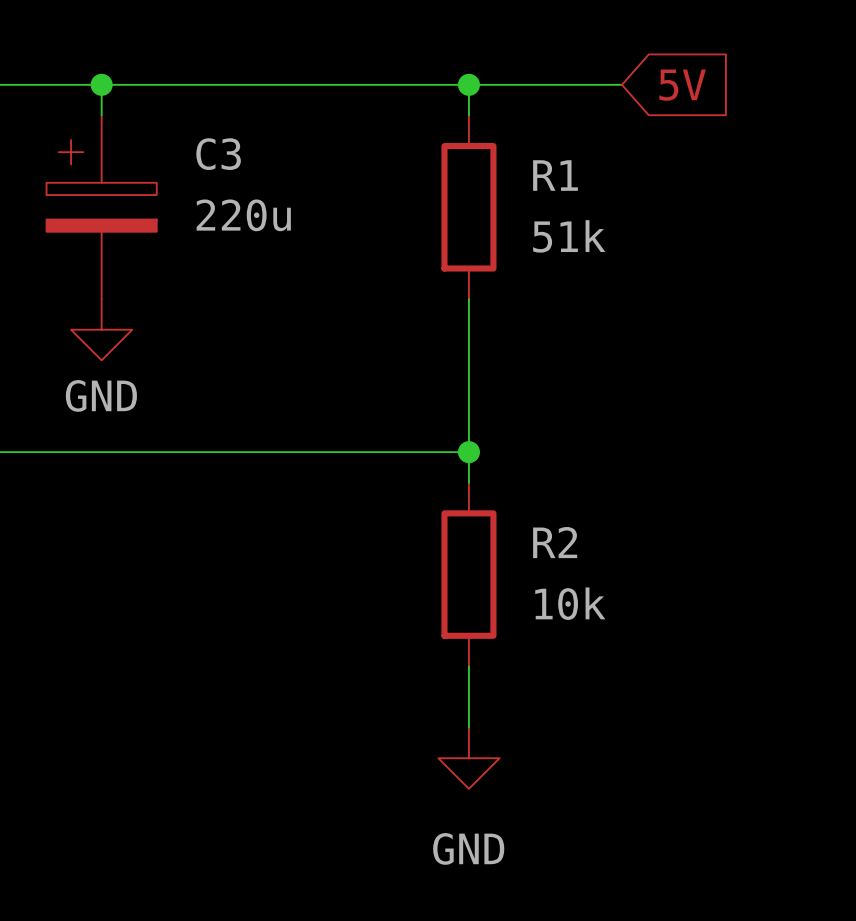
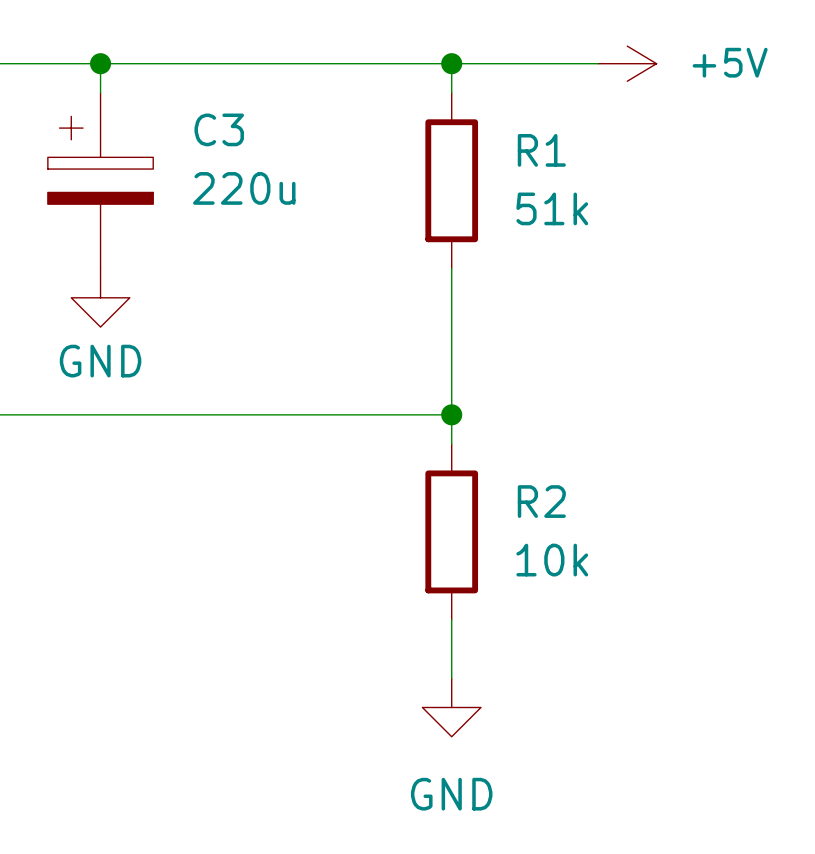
power symbol: none -> +5V (627, 63)
global label: 5V (682, 85) -> none

